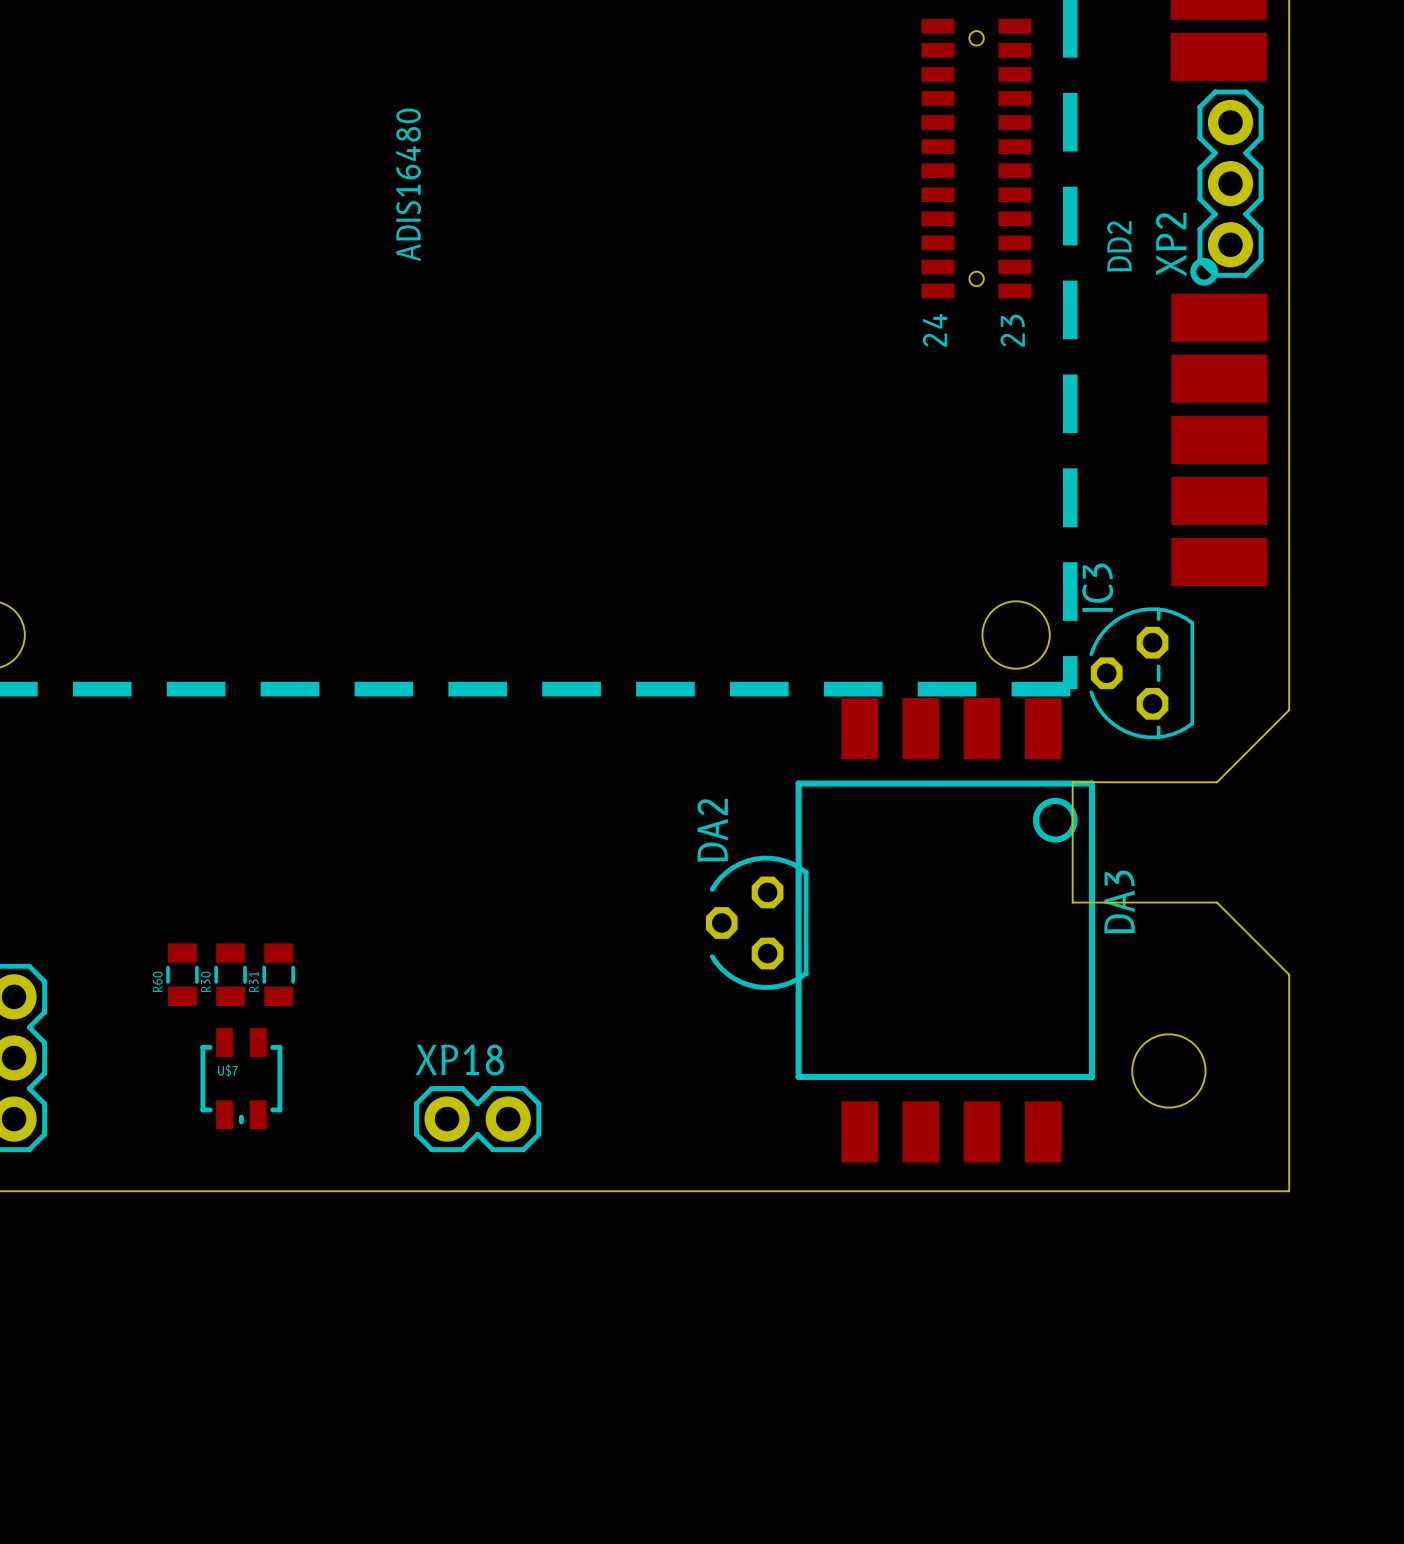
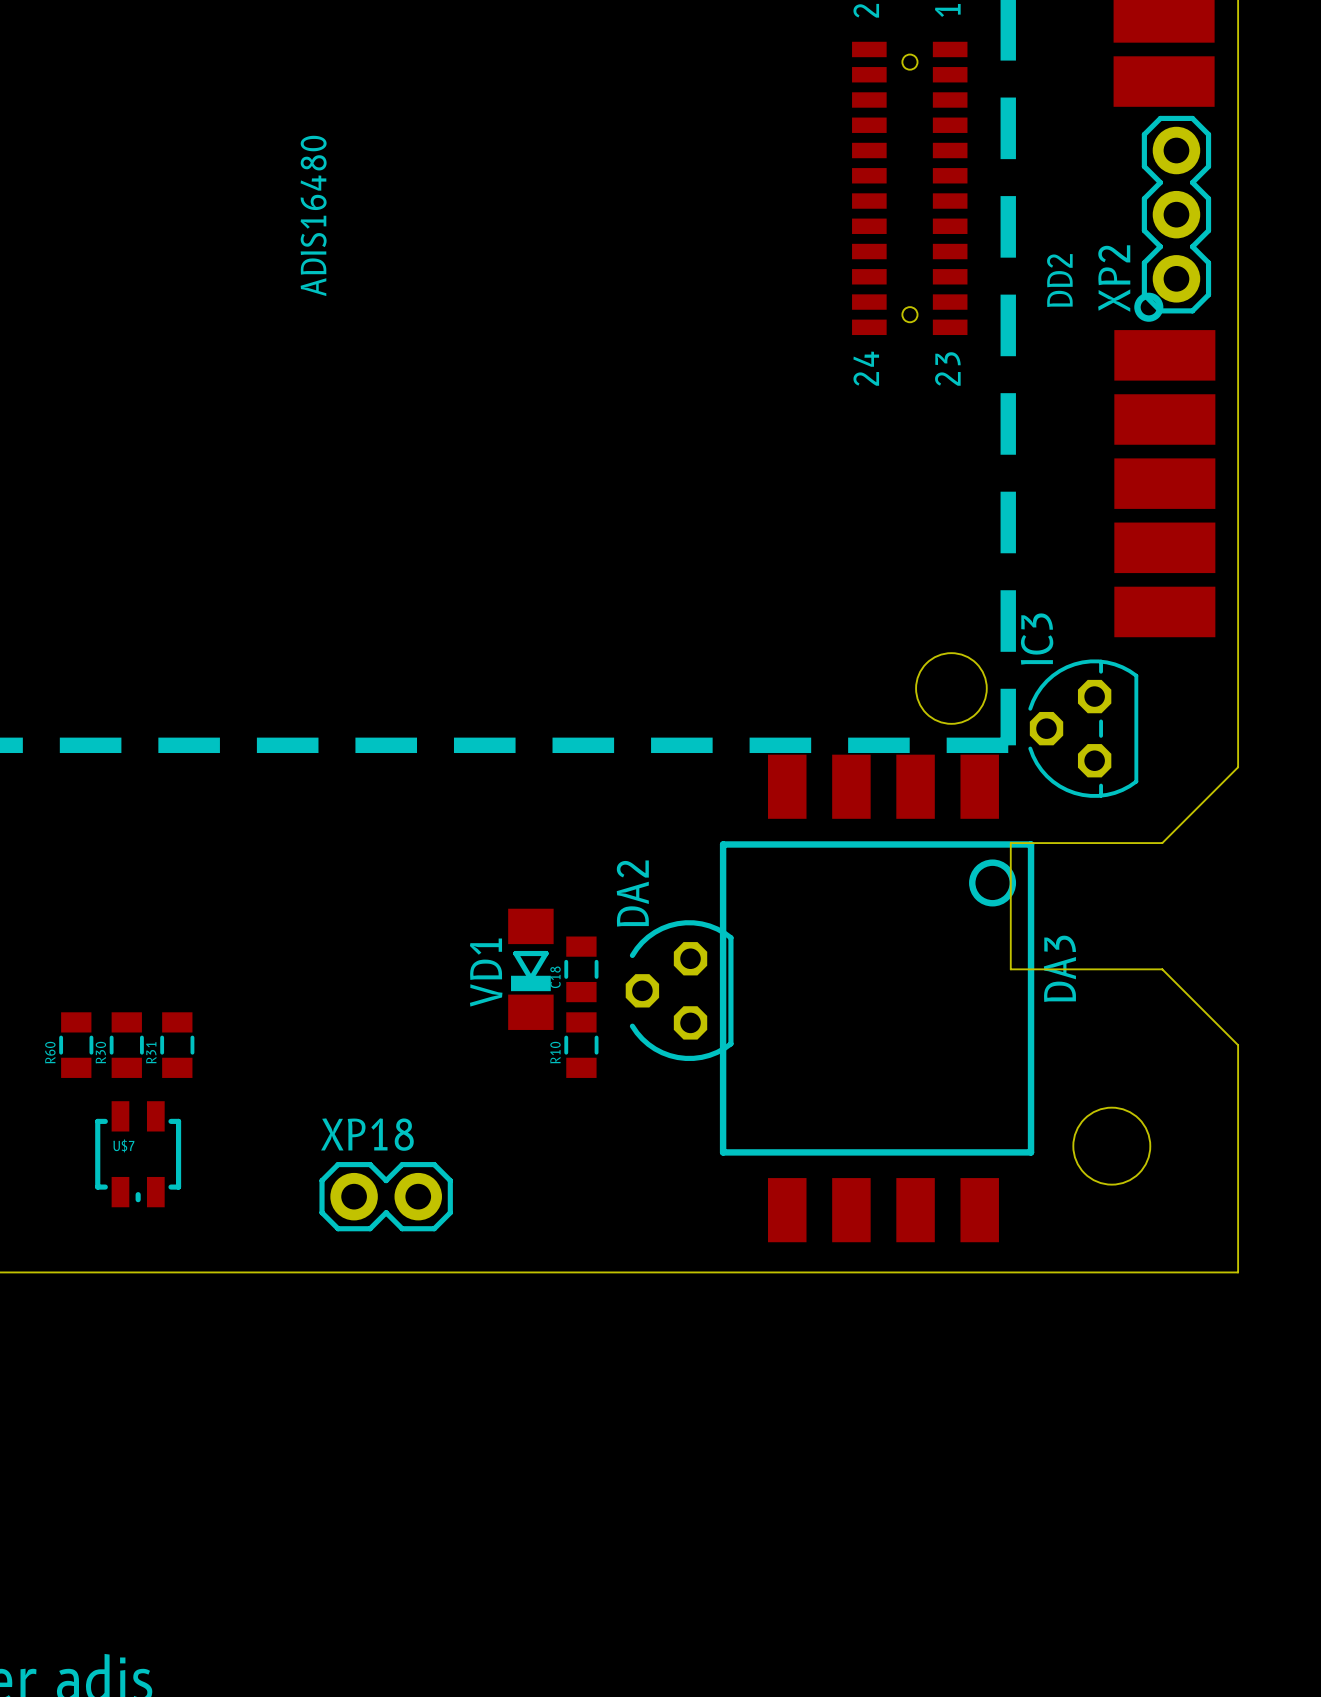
VD1: none -> (530, 969)
C18: none -> (581, 969)
R10: none -> (581, 1045)

